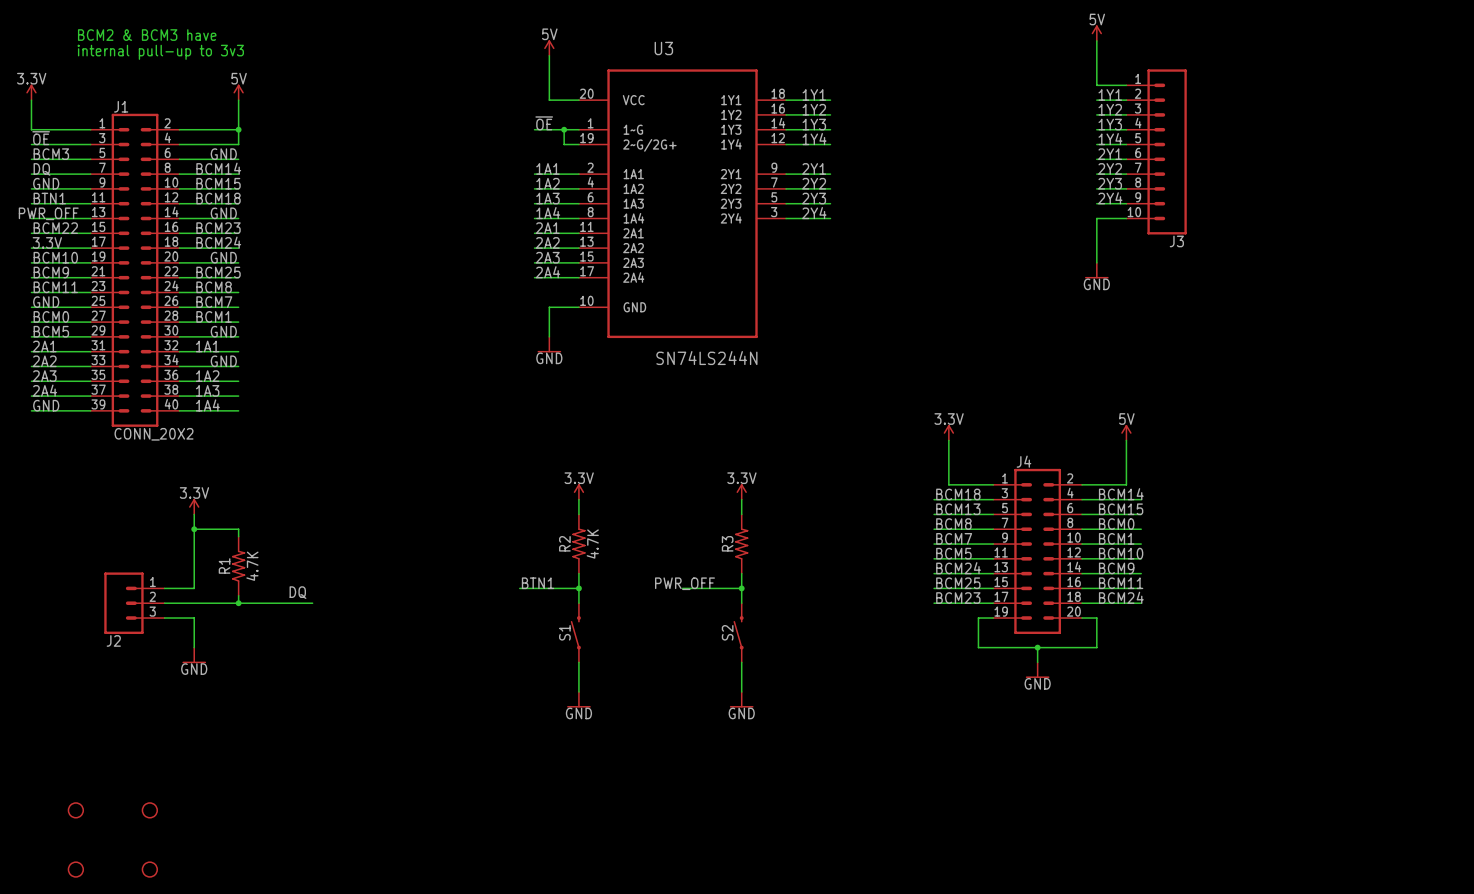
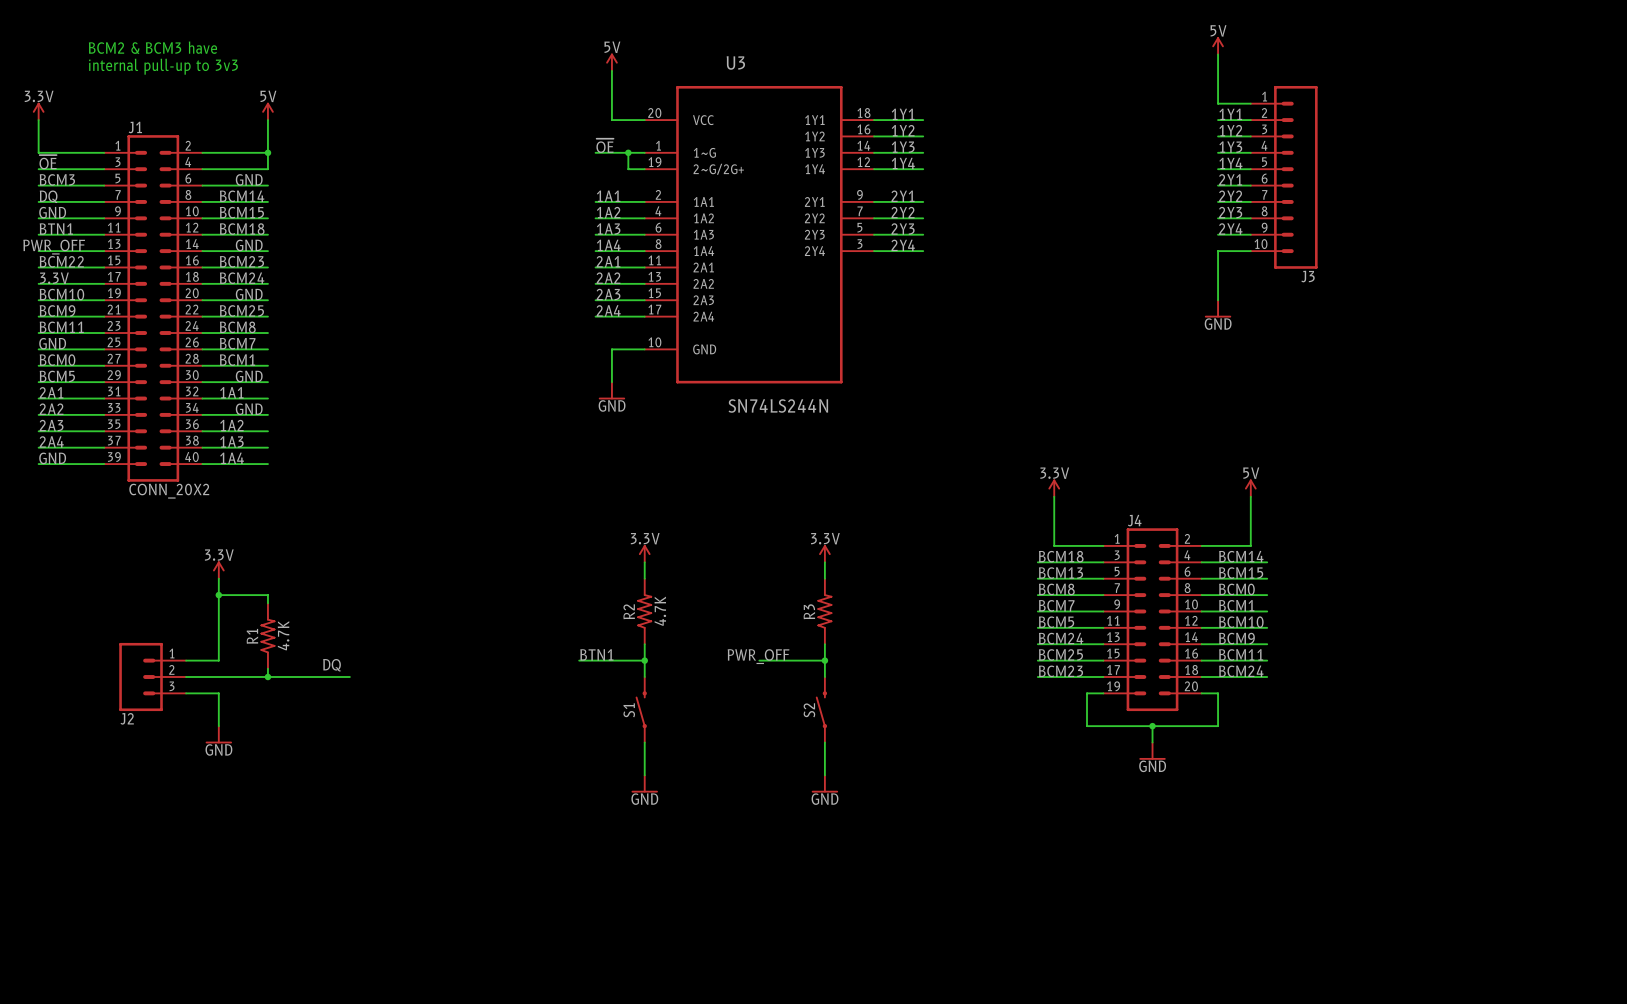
part: (75, 810) -> none
part: (149, 810) -> none
part: (75, 869) -> none
part: (149, 869) -> none

